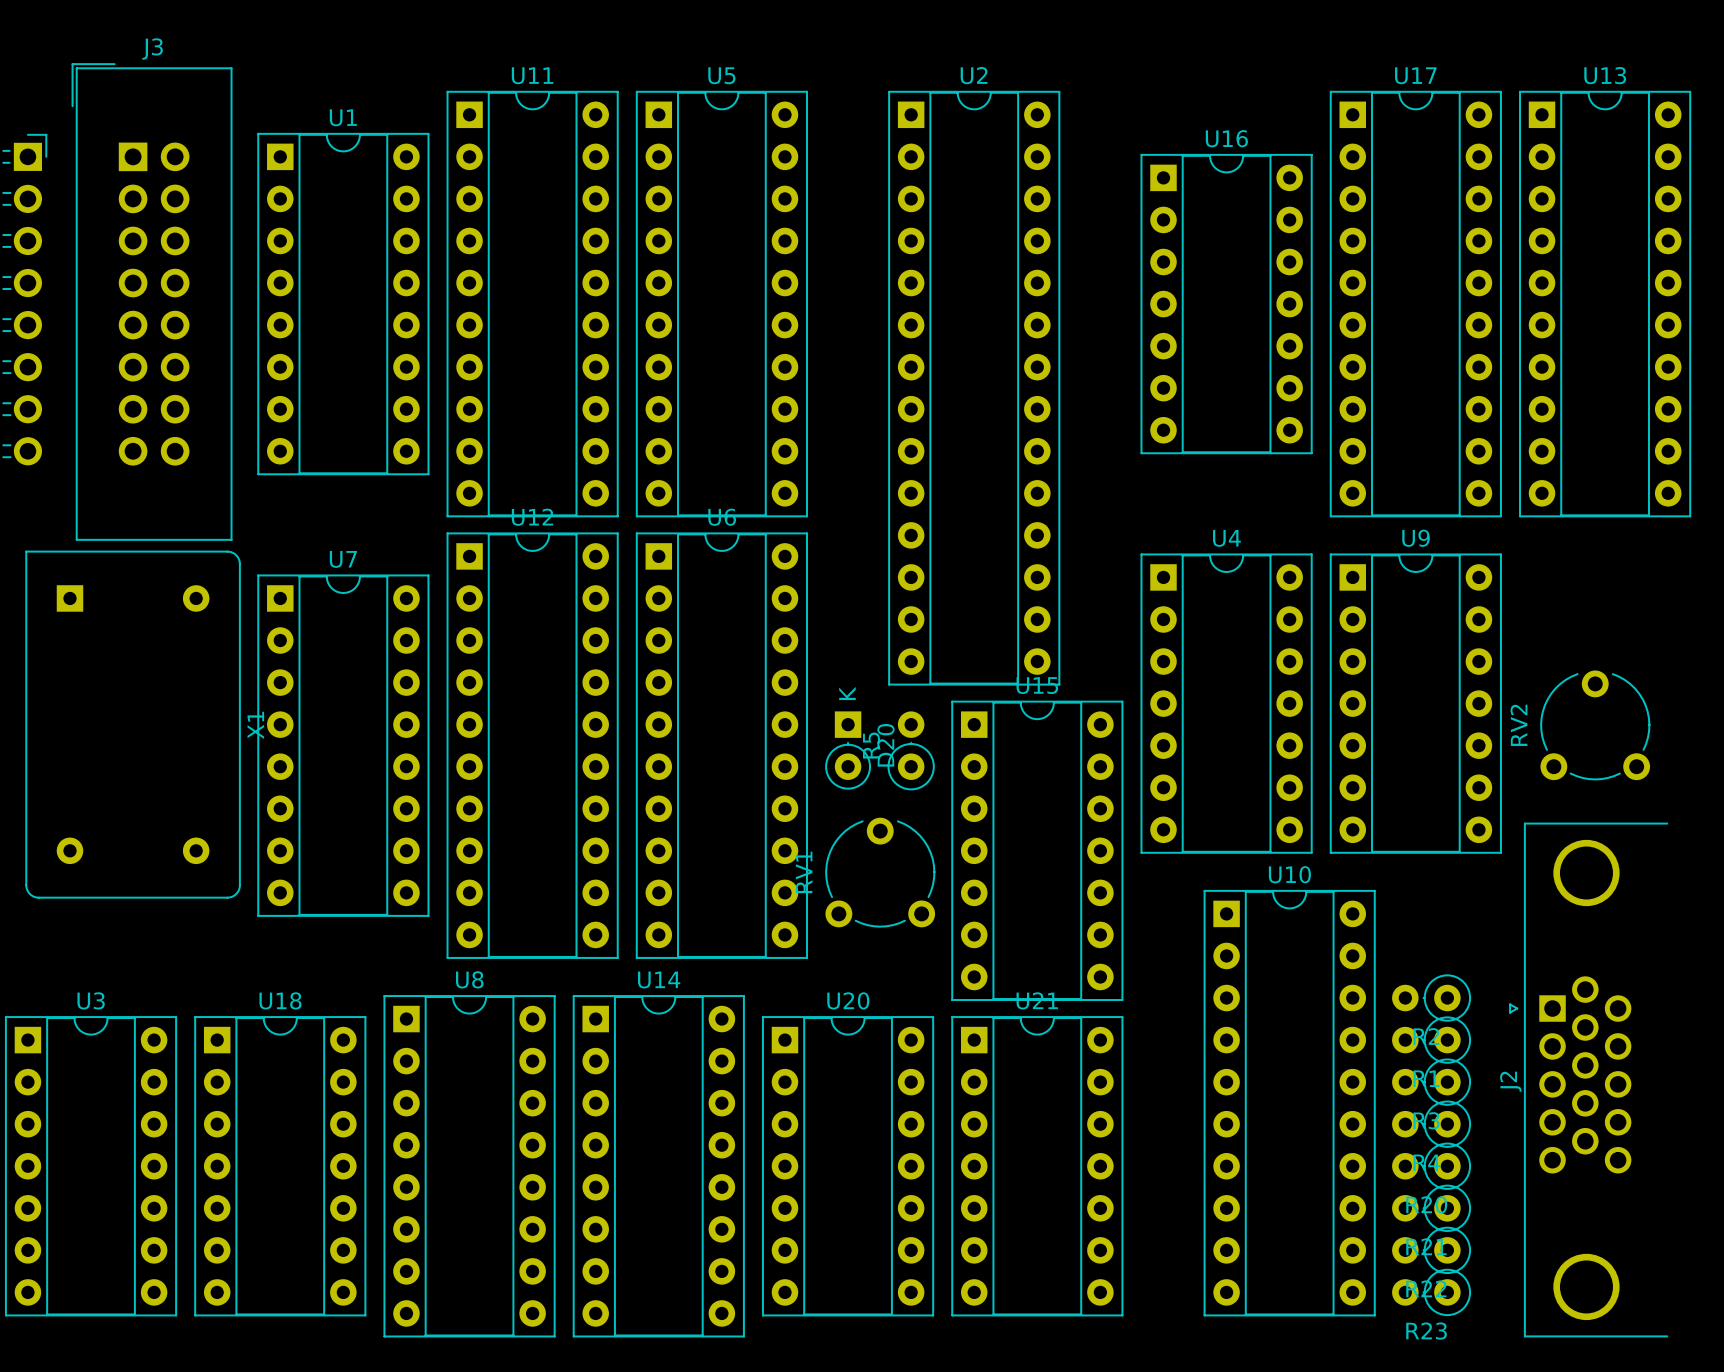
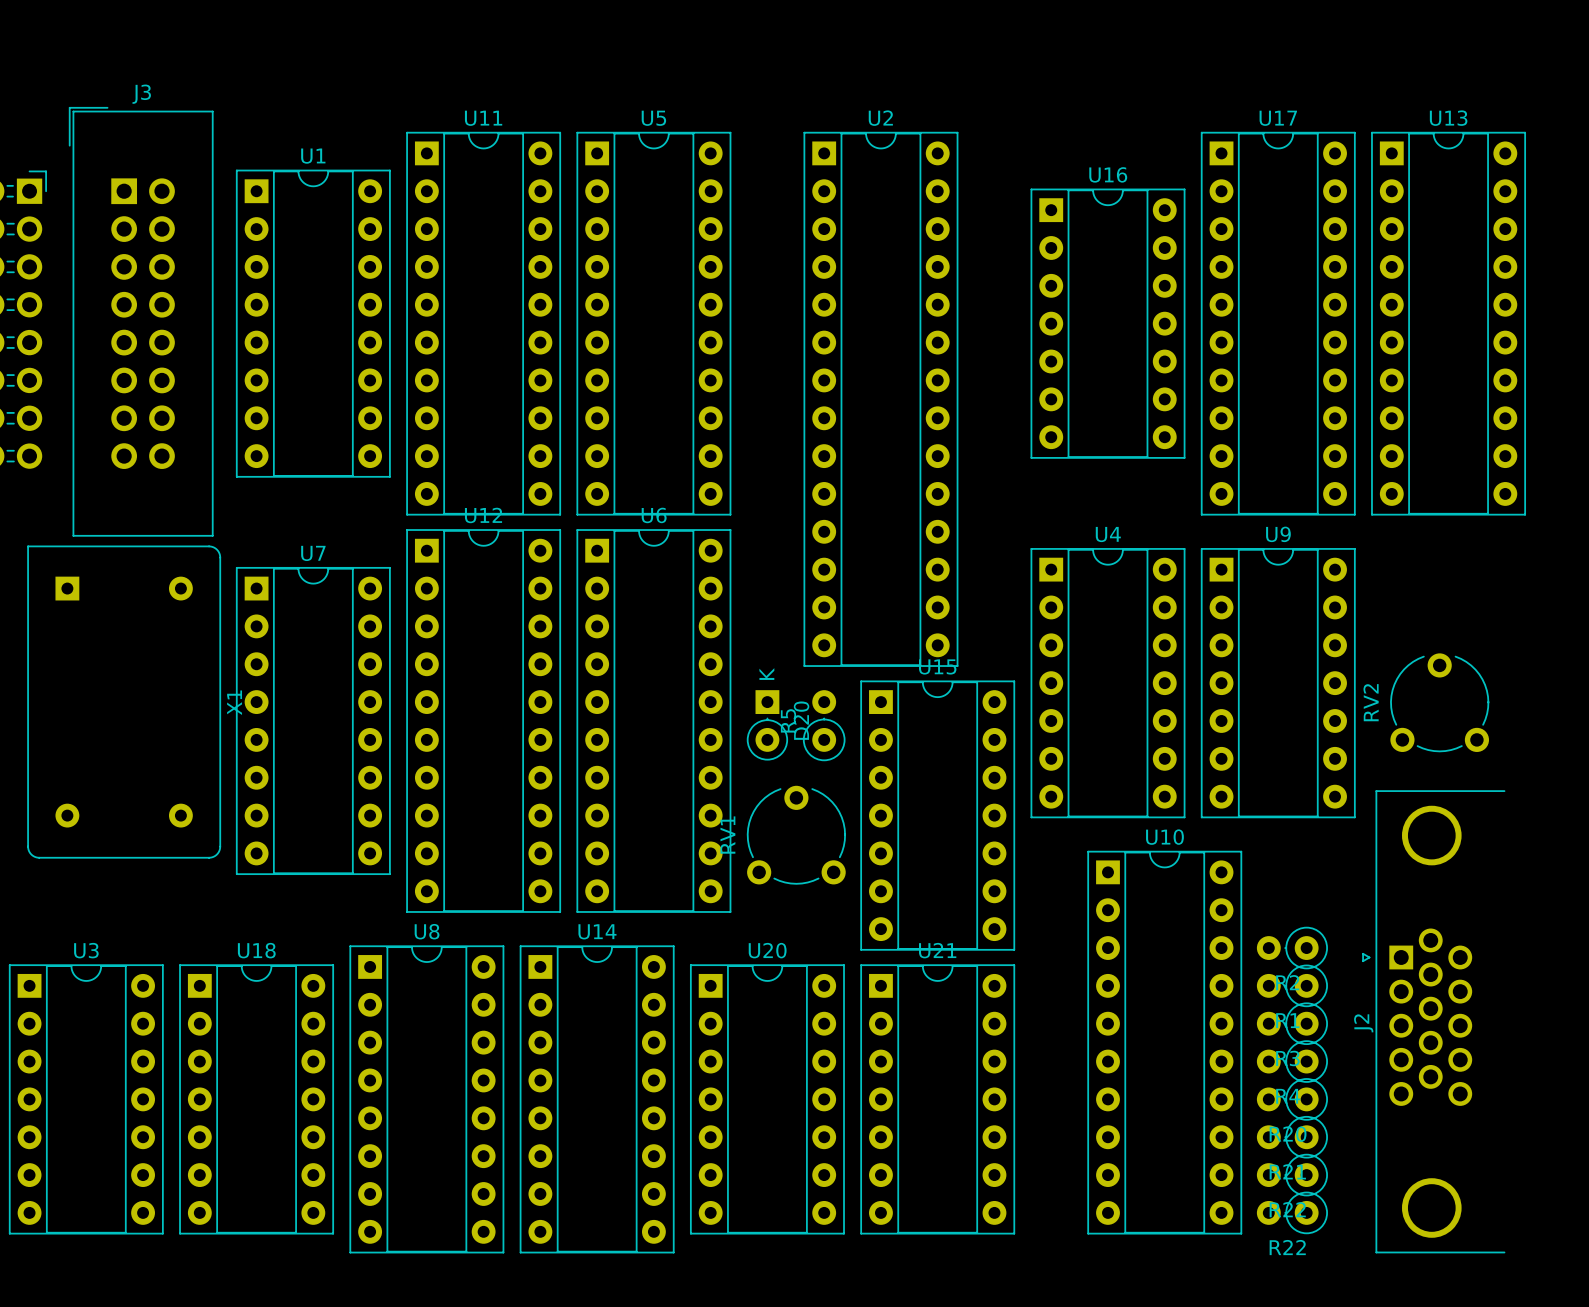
R23 name: R23 (1426, 1331) -> R22 (1287, 1247)

